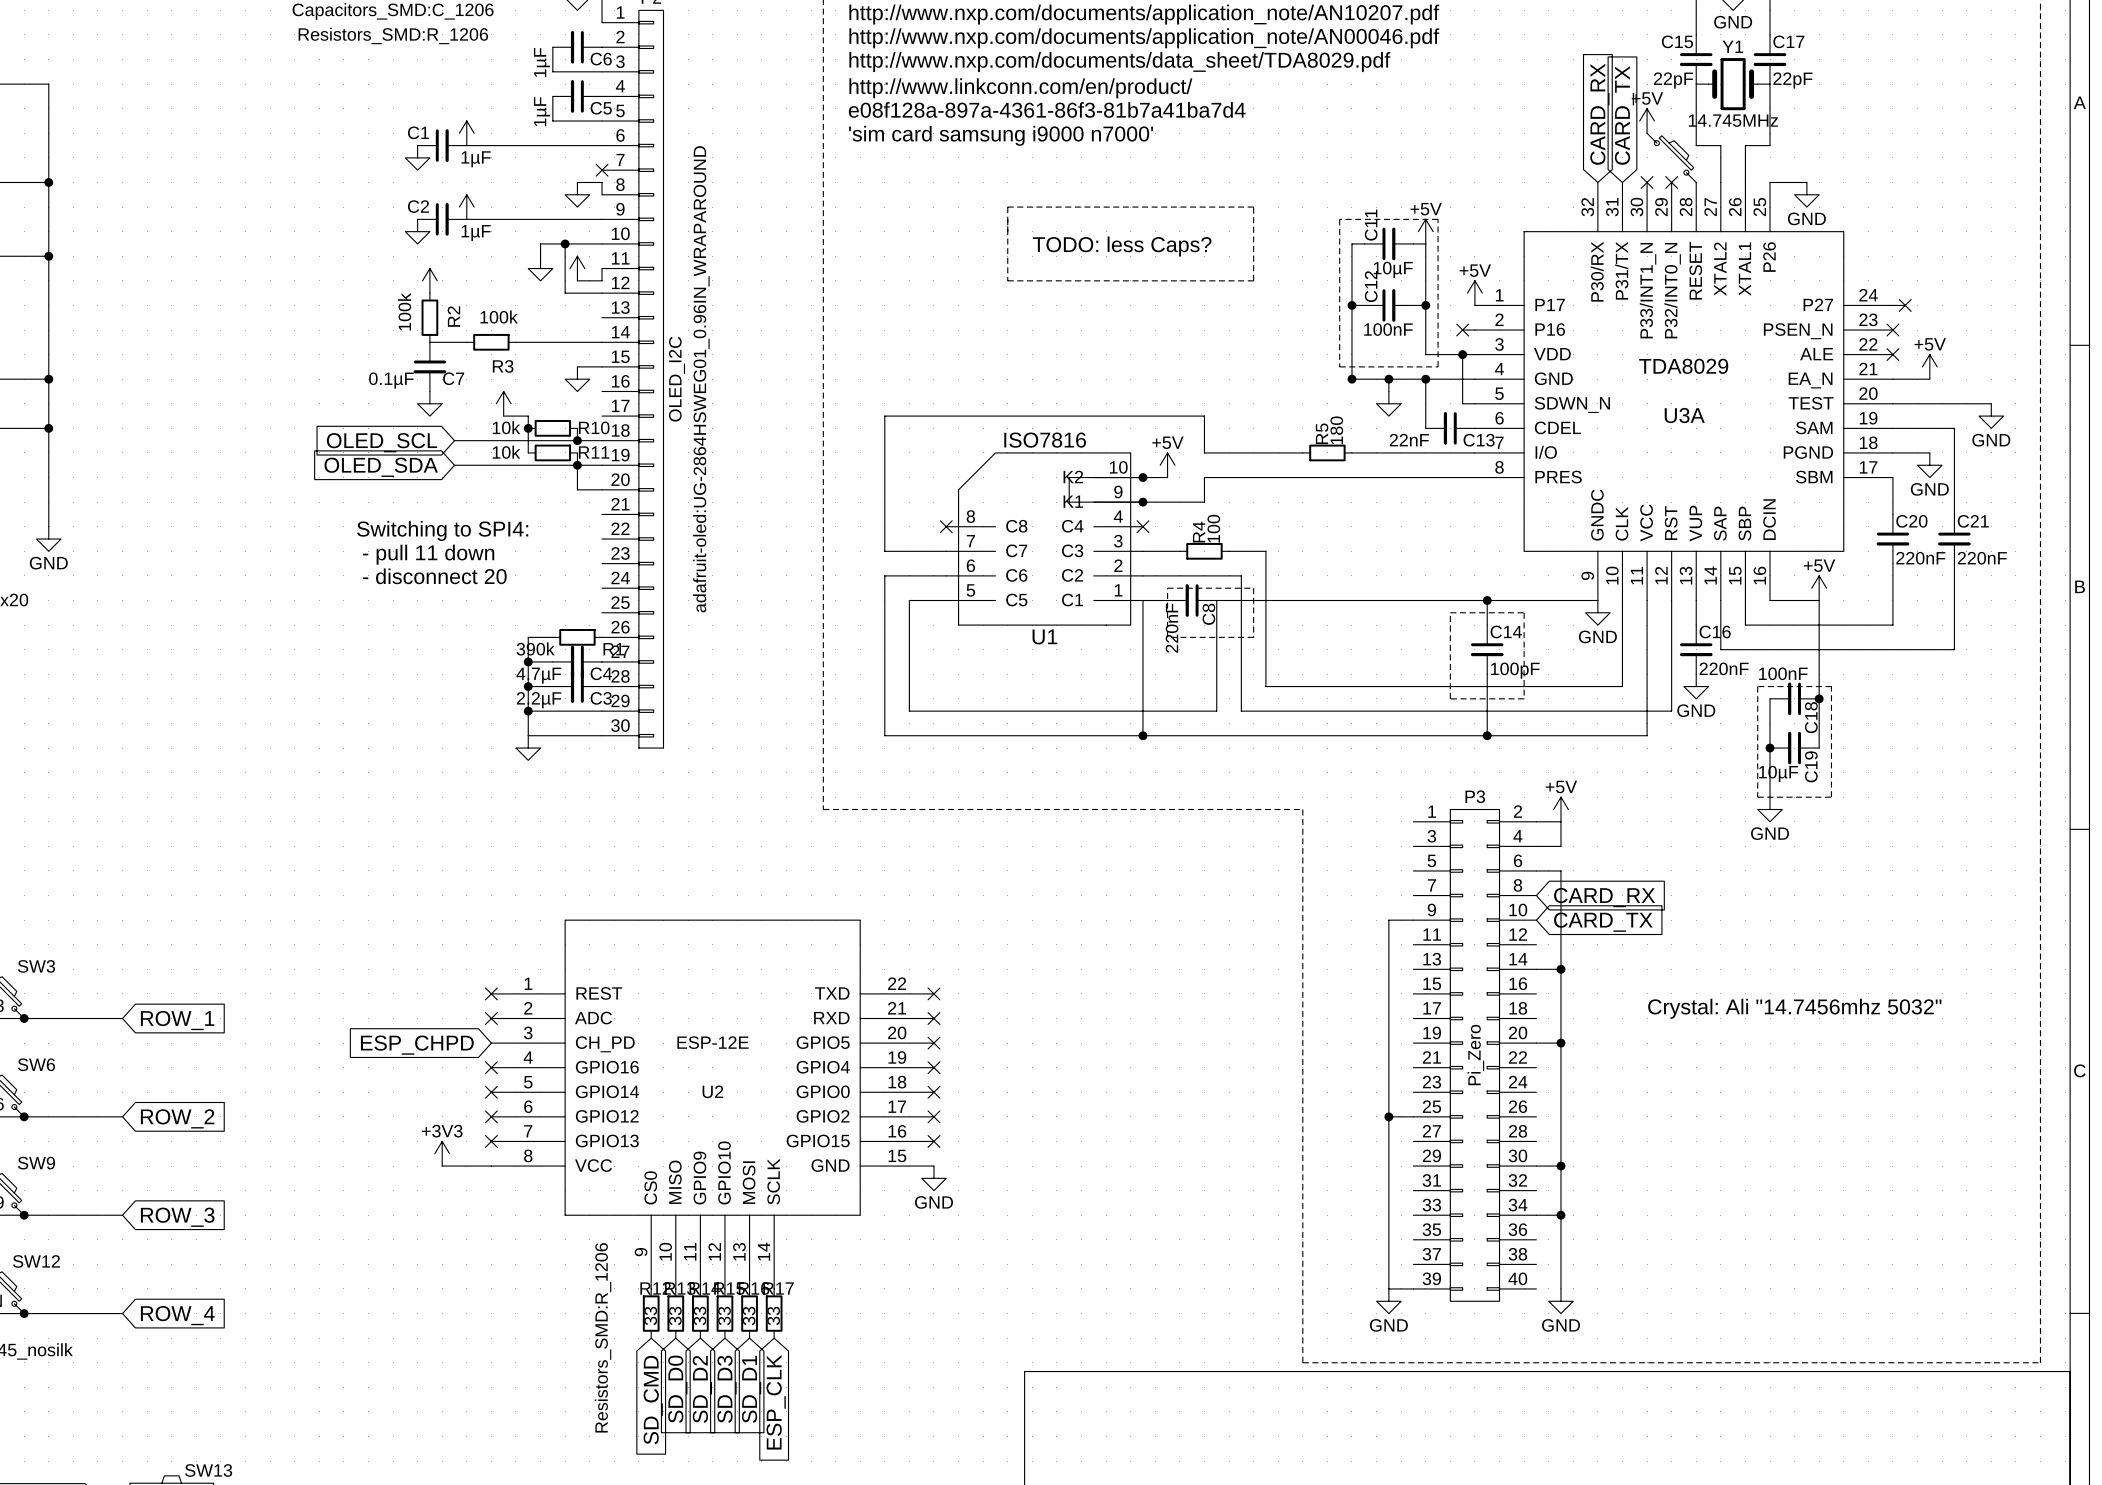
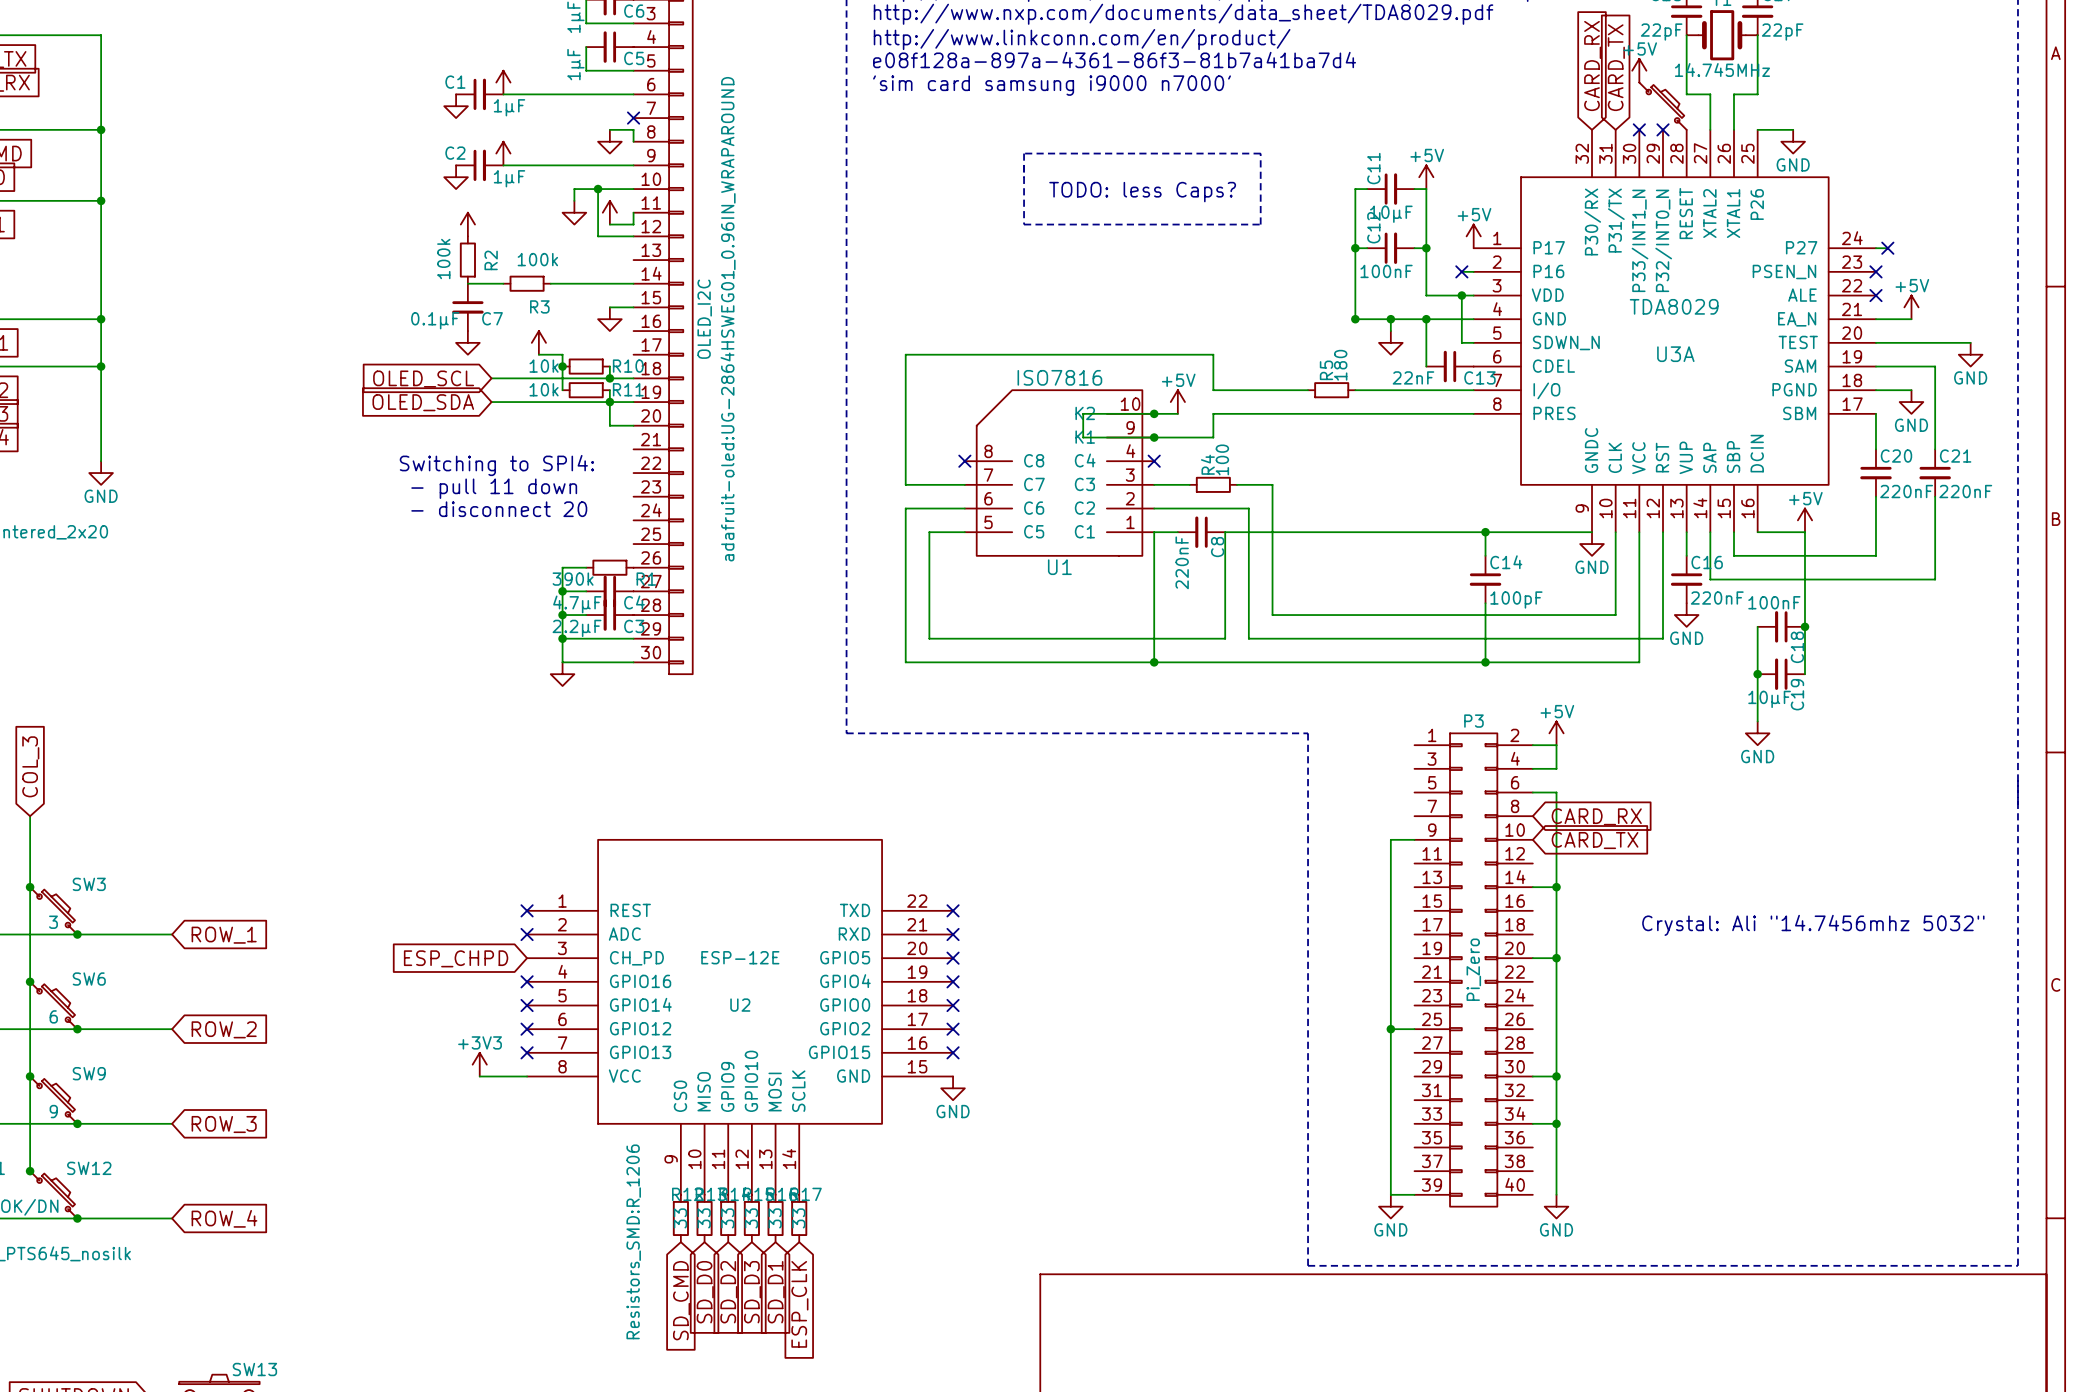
line: (1339, 219) (1339, 366) (1438, 366) (1438, 219) (1339, 219) -> none
line: (1167, 588) (1167, 637) (1253, 637) (1253, 588) (1167, 588) -> none
line: (1450, 612) (1450, 698) (1524, 698) (1524, 612) (1450, 612) -> none
line: (1757, 686) (1831, 686) (1831, 797) (1757, 797) (1757, 686) -> none

